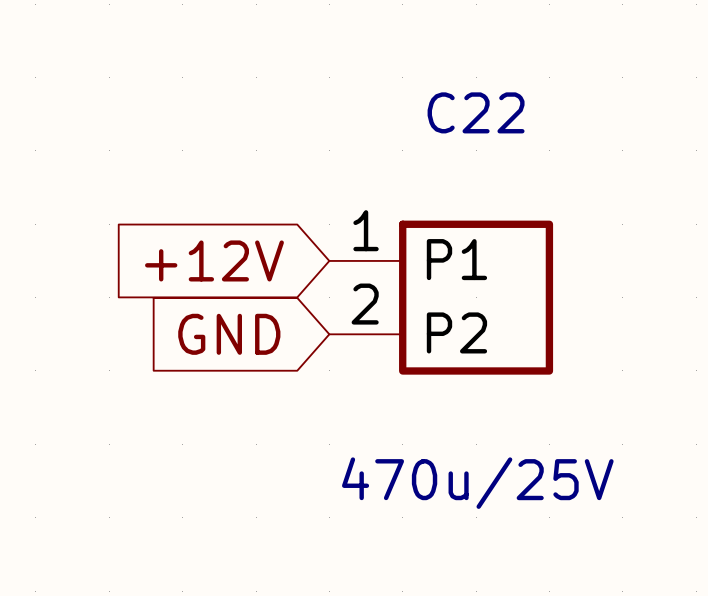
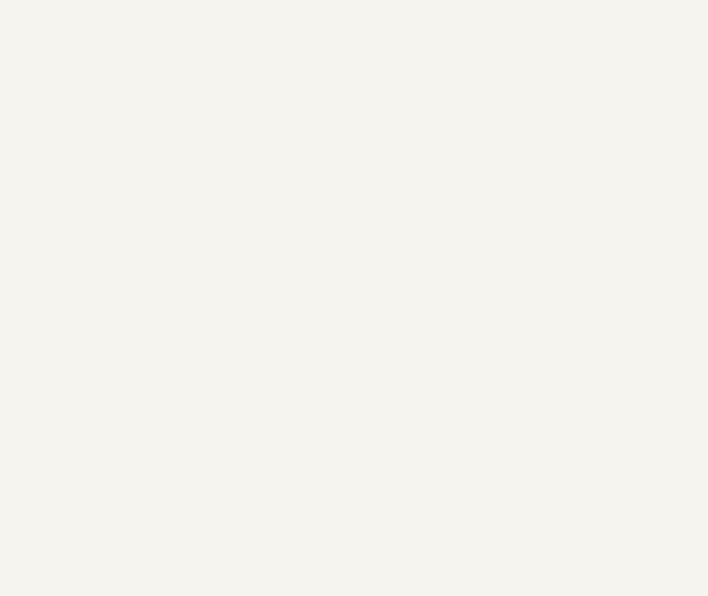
global label: +12V (214, 260) -> none
C22: 470u/25V (441, 297) -> none
global label: GND (229, 334) -> none

